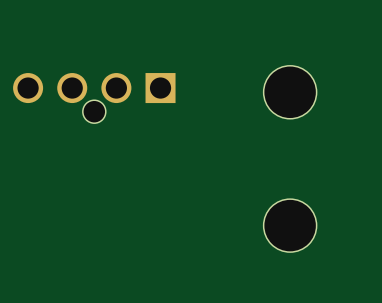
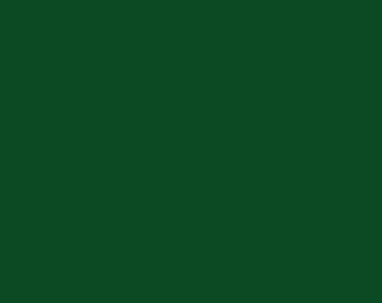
part: (290, 92) -> none
part: (94, 98) -> none
part: (290, 225) -> none

